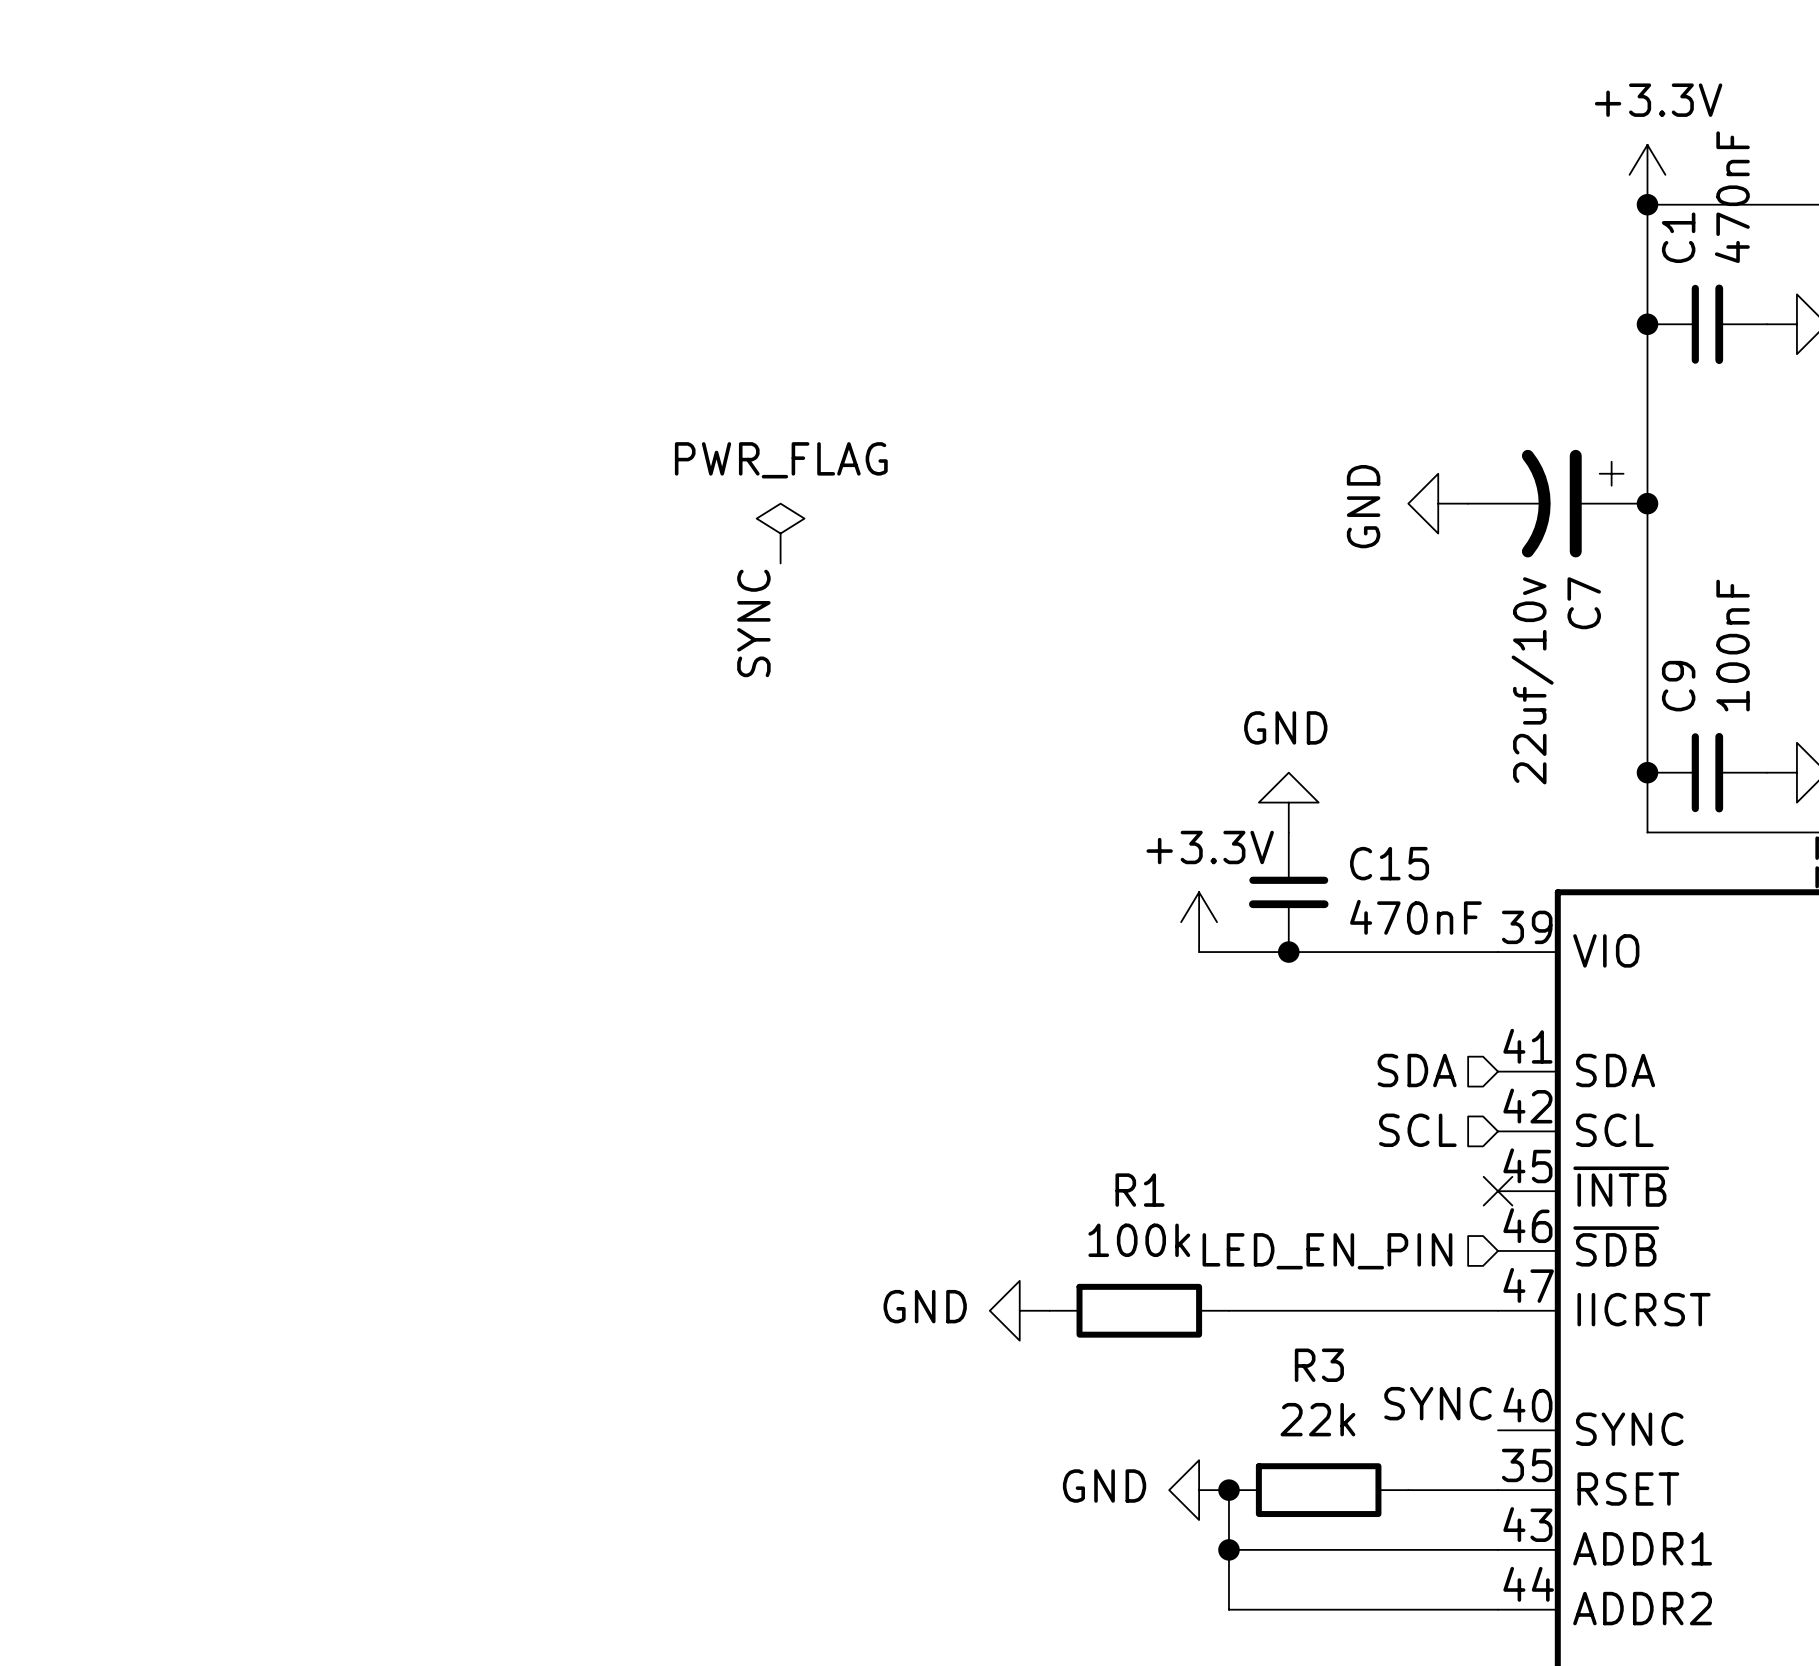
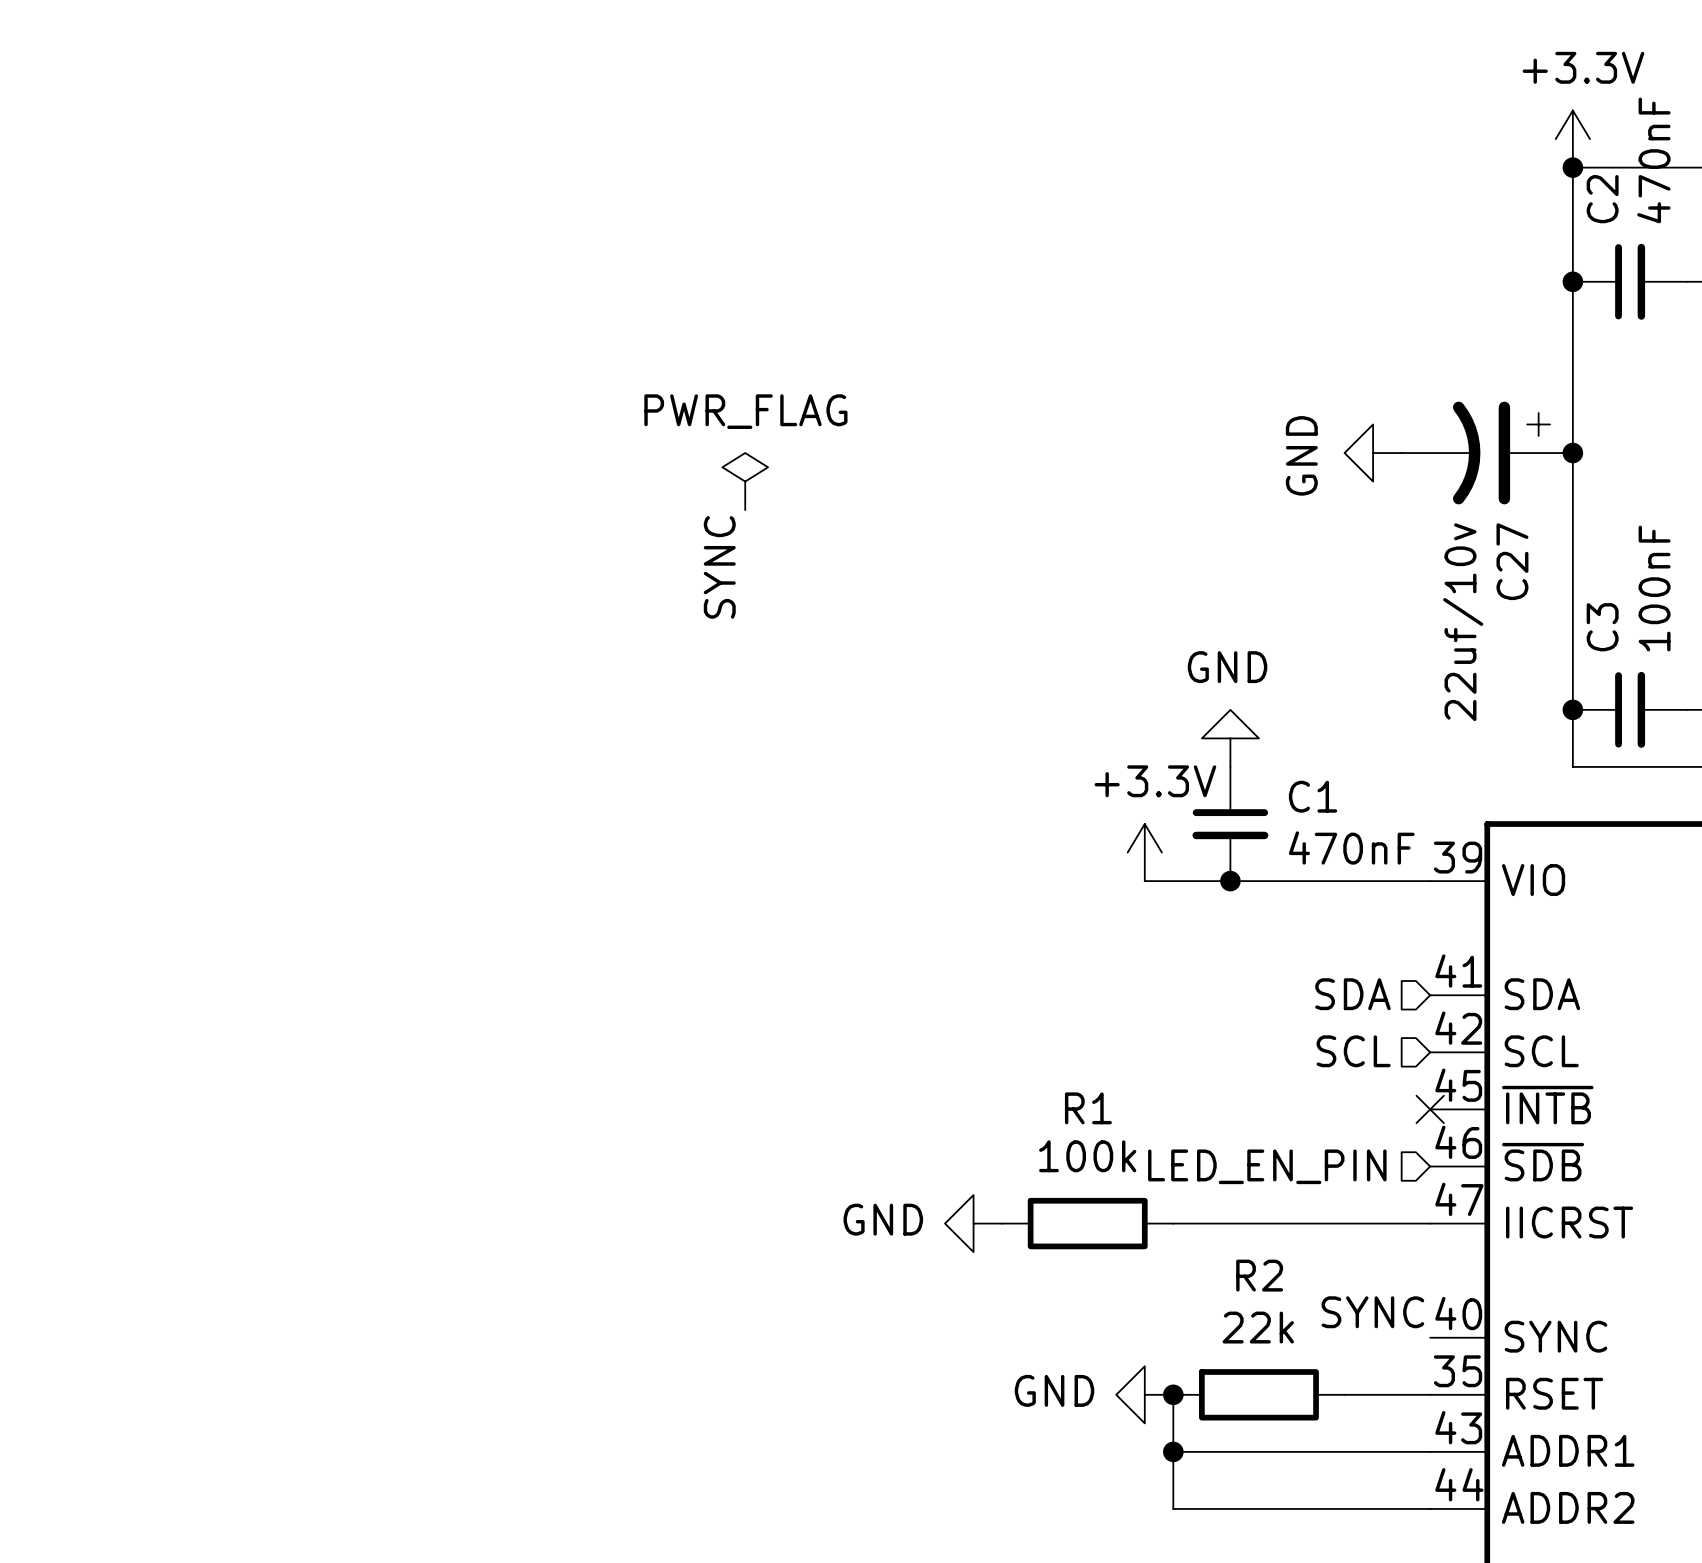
C1 name: C1 (1678, 237) -> C2 (1602, 199)
C7 name: C7 (1584, 603) -> C27 (1512, 561)
C9 name: C9 (1678, 686) -> C3 (1602, 627)
C15 name: C15 (1389, 863) -> C1 (1313, 796)
R3 name: R3 (1319, 1365) -> R2 (1259, 1275)

